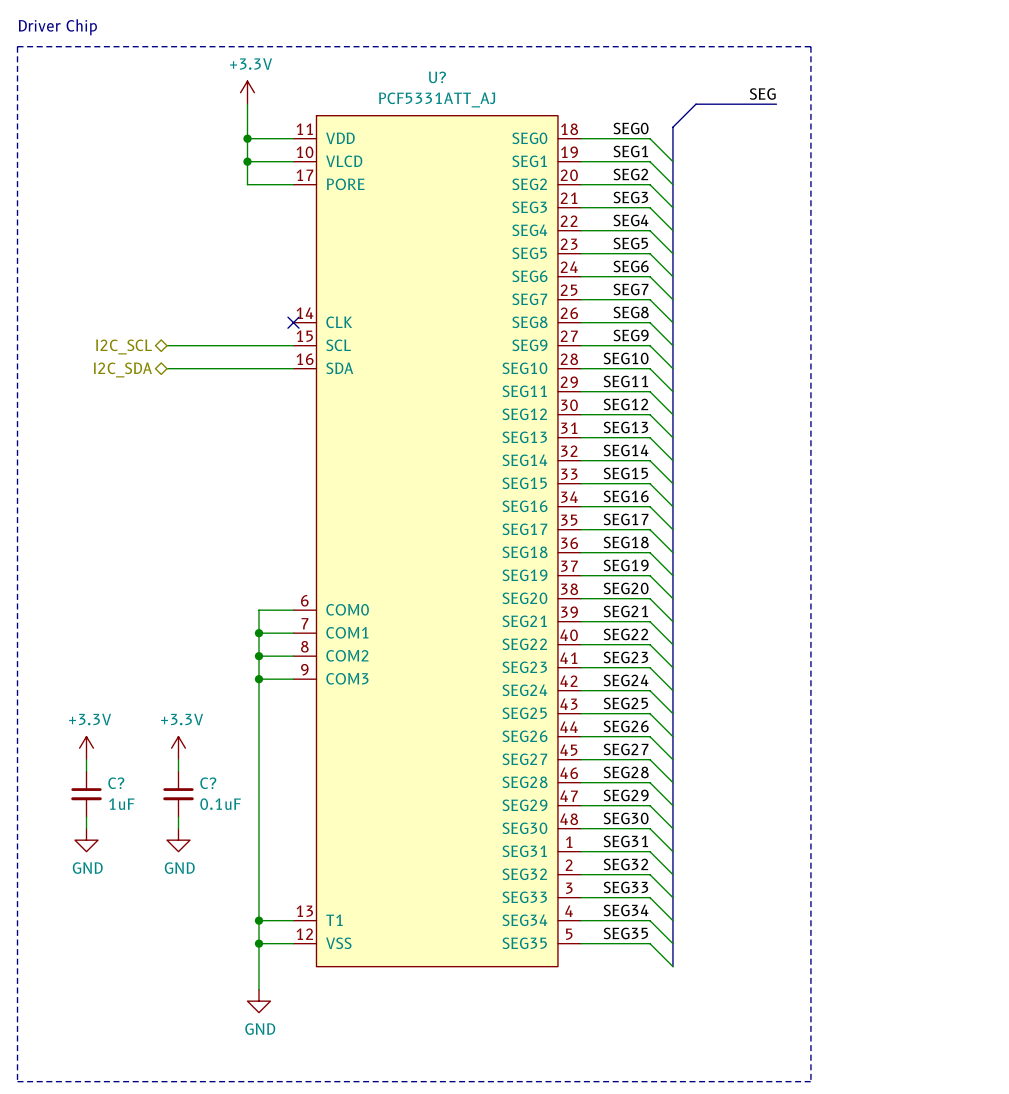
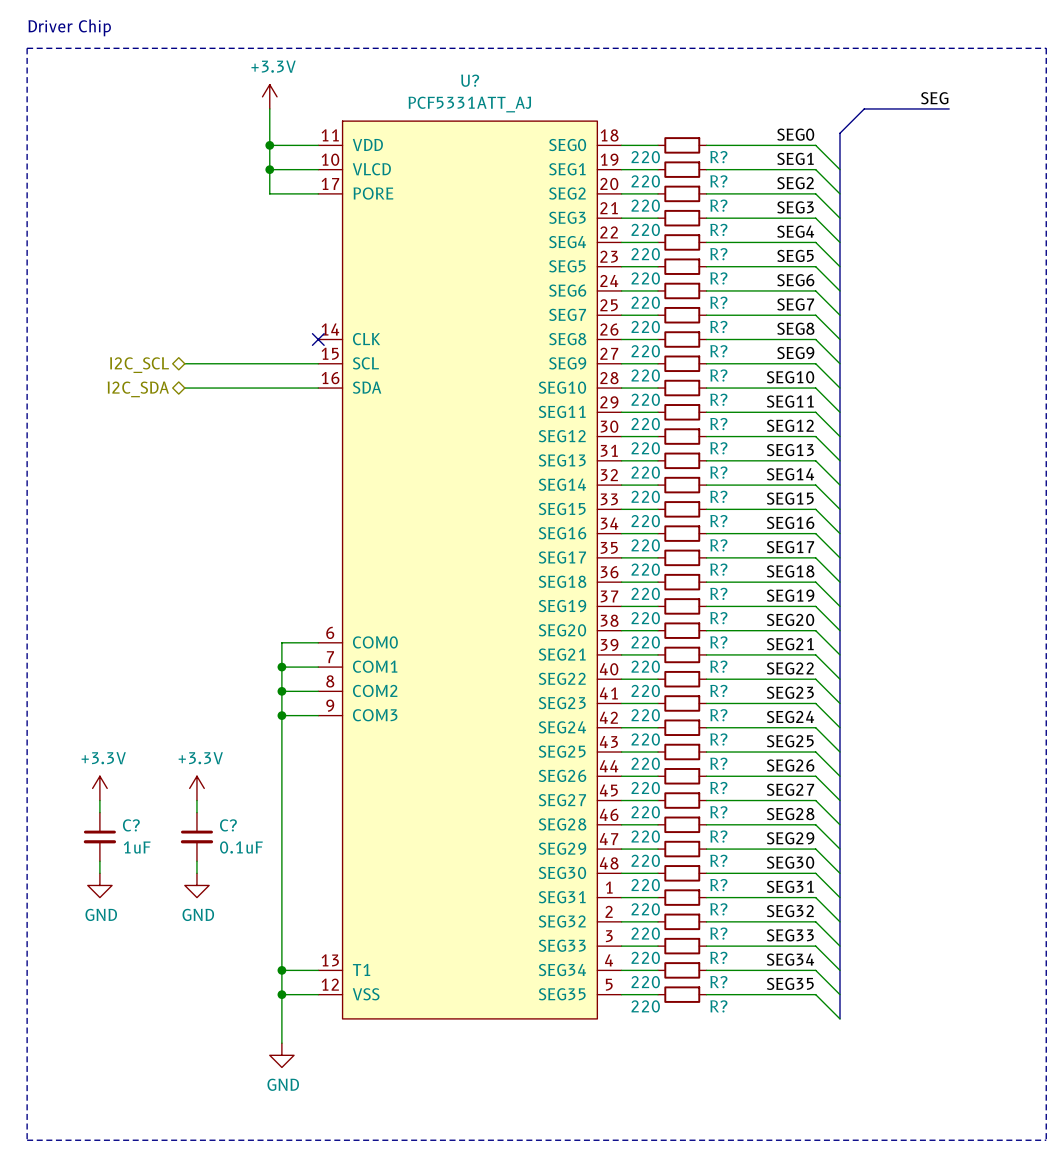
line: (810, 46) (810, 1081) -> (864, 48) (1046, 48) (1046, 1140) (864, 1140)
label position: SEG (762, 94) -> SEG (934, 98)
bus: (776, 104) (695, 104) (672, 127) (672, 966) -> (949, 108) (864, 108) (839, 133) (839, 1018)
label position: SEG0 (631, 128) -> SEG0 (795, 134)
wire: (615, 138) (649, 138) (672, 161) -> none
R?: none -> 220 (682, 145)
wire: none -> (706, 145) (815, 145) (839, 169)
label position: SEG1 (630, 151) -> SEG1 (795, 158)
wire: (615, 161) (649, 161) (672, 184) -> none
R?: none -> 220 (682, 169)
wire: none -> (706, 169) (815, 169) (839, 193)
label position: SEG2 (630, 174) -> SEG2 (795, 183)
wire: (615, 184) (649, 184) (672, 207) -> none
R?: none -> 220 (682, 193)
wire: none -> (706, 193) (815, 193) (839, 218)
label position: SEG3 (630, 197) -> SEG3 (795, 207)
wire: (615, 207) (649, 207) (672, 230) -> none
R?: none -> 220 (682, 218)
wire: none -> (706, 218) (815, 218) (839, 242)
label position: SEG4 (630, 220) -> SEG4 (795, 231)
wire: (615, 230) (649, 230) (672, 253) -> none
R?: none -> 220 (682, 242)
wire: none -> (706, 242) (815, 242) (839, 266)
label position: SEG5 (630, 243) -> SEG5 (795, 255)
wire: (615, 253) (649, 253) (672, 276) -> none
R?: none -> 220 (682, 266)
wire: none -> (706, 266) (815, 266) (839, 290)
label position: SEG6 (631, 266) -> SEG6 (795, 280)
wire: (615, 276) (649, 276) (672, 299) -> none
R?: none -> 220 (682, 290)
wire: none -> (706, 290) (815, 290) (839, 315)
label position: SEG7 (630, 289) -> SEG7 (795, 304)
wire: (615, 299) (649, 299) (672, 322) -> none
R?: none -> 220 (682, 315)
wire: none -> (706, 315) (815, 315) (839, 339)
label position: SEG8 (631, 312) -> SEG8 (795, 328)
wire: (615, 322) (649, 322) (672, 345) -> none
R?: none -> 220 (682, 339)
wire: none -> (706, 339) (815, 339) (839, 363)
label position: SEG9 (631, 335) -> SEG9 (795, 353)
wire: (615, 345) (649, 345) (672, 368) -> none
R?: none -> 220 (682, 363)
wire: none -> (706, 363) (815, 363) (839, 388)
label position: SEG10 (626, 358) -> SEG10 (790, 377)
wire: (615, 368) (649, 368) (672, 391) -> none
R?: none -> 220 (682, 388)
wire: none -> (706, 388) (815, 388) (839, 412)
label position: SEG11 (625, 381) -> SEG11 (790, 401)
wire: (615, 391) (649, 391) (672, 414) -> none
R?: none -> 220 (682, 412)
wire: none -> (706, 412) (815, 412) (839, 436)
label position: SEG12 (625, 404) -> SEG12 (790, 425)
wire: (615, 414) (649, 414) (672, 437) -> none
R?: none -> 220 (682, 436)
wire: none -> (706, 436) (815, 436) (839, 460)
label position: SEG13 (625, 427) -> SEG13 (790, 450)
wire: (615, 437) (649, 437) (672, 460) -> none
R?: none -> 220 (682, 460)
wire: none -> (706, 460) (815, 460) (839, 485)
label position: SEG14 (626, 450) -> SEG14 (790, 474)
wire: (615, 460) (649, 460) (672, 483) -> none
R?: none -> 220 (682, 485)
wire: none -> (706, 485) (815, 485) (839, 509)
label position: SEG15 (625, 473) -> SEG15 (790, 498)
wire: (615, 483) (649, 483) (672, 506) -> none
R?: none -> 220 (682, 509)
wire: none -> (706, 509) (815, 509) (839, 533)
label position: SEG16 (626, 496) -> SEG16 (790, 522)
wire: (615, 506) (649, 506) (672, 529) -> none
R?: none -> 220 (682, 533)
wire: none -> (706, 533) (815, 533) (839, 557)
label position: SEG17 (626, 519) -> SEG17 (790, 547)
wire: (615, 529) (649, 529) (672, 552) -> none
R?: none -> 220 (682, 557)
wire: none -> (706, 557) (815, 557) (839, 582)
label position: SEG18 (626, 542) -> SEG18 (790, 571)
wire: (615, 552) (649, 552) (672, 575) -> none
R?: none -> 220 (682, 582)
wire: none -> (706, 582) (815, 582) (839, 606)
label position: SEG19 (626, 565) -> SEG19 (790, 595)
wire: (615, 575) (649, 575) (672, 598) -> none
R?: none -> 220 (682, 606)
wire: none -> (706, 606) (815, 606) (839, 630)
label position: SEG20 (626, 588) -> SEG20 (790, 619)
wire: (615, 598) (649, 598) (672, 621) -> none
R?: none -> 220 (682, 630)
wire: none -> (706, 630) (815, 630) (839, 654)
label position: SEG21 (625, 611) -> SEG21 (790, 644)
wire: (615, 621) (649, 621) (672, 644) -> none
R?: none -> 220 (682, 654)
wire: none -> (706, 654) (815, 654) (839, 679)
label position: SEG22 (625, 634) -> SEG22 (790, 668)
wire: (615, 644) (649, 644) (672, 667) -> none
R?: none -> 220 (682, 679)
wire: none -> (706, 679) (815, 679) (839, 703)
label position: SEG23 (625, 657) -> SEG23 (790, 692)
wire: (615, 667) (649, 667) (672, 690) -> none
R?: none -> 220 (682, 703)
wire: none -> (706, 703) (815, 703) (839, 727)
label position: SEG24 (626, 680) -> SEG24 (790, 716)
wire: (615, 690) (649, 690) (672, 713) -> none
R?: none -> 220 (682, 727)
wire: none -> (706, 727) (815, 727) (839, 752)
label position: SEG25 (625, 703) -> SEG25 (790, 741)
wire: (615, 713) (649, 713) (672, 736) -> none
R?: none -> 220 (682, 752)
wire: none -> (706, 752) (815, 752) (839, 776)
label position: SEG26 (626, 726) -> SEG26 (790, 765)
wire: (615, 736) (649, 736) (672, 759) -> none
R?: none -> 220 (682, 776)
wire: none -> (706, 776) (815, 776) (839, 800)
label position: SEG27 (626, 749) -> SEG27 (790, 789)
wire: (615, 759) (649, 759) (672, 782) -> none
R?: none -> 220 (682, 800)
wire: none -> (706, 800) (815, 800) (839, 824)
label position: SEG28 (626, 772) -> SEG28 (790, 814)
wire: (615, 782) (649, 782) (672, 805) -> none
R?: none -> 220 (682, 824)
wire: none -> (706, 824) (815, 824) (839, 849)
label position: SEG29 (626, 795) -> SEG29 (790, 838)
wire: (615, 805) (649, 805) (672, 828) -> none
R?: none -> 220 (682, 849)
wire: none -> (706, 849) (815, 849) (839, 873)
label position: SEG30 (626, 818) -> SEG30 (790, 862)
wire: (615, 828) (649, 828) (672, 851) -> none
R?: none -> 220 (682, 873)
wire: none -> (706, 873) (815, 873) (839, 897)
label position: SEG31 (625, 841) -> SEG31 (790, 886)
wire: (615, 851) (649, 851) (672, 874) -> none
R?: none -> 220 (682, 897)
wire: none -> (706, 897) (815, 897) (839, 921)
label position: SEG32 (625, 864) -> SEG32 (790, 911)
wire: (615, 874) (649, 874) (672, 897) -> none
R?: none -> 220 (682, 921)
wire: none -> (706, 921) (815, 921) (839, 946)
label position: SEG33 (625, 887) -> SEG33 (790, 935)
wire: (615, 897) (649, 897) (672, 920) -> none
R?: none -> 220 (682, 946)
wire: none -> (706, 946) (815, 946) (839, 970)
label position: SEG34 (626, 910) -> SEG34 (790, 959)
wire: (615, 920) (649, 920) (672, 943) -> none
R?: none -> 220 (682, 970)
wire: none -> (706, 970) (815, 970) (839, 994)
label position: SEG35 (625, 933) -> SEG35 (790, 983)
wire: (615, 943) (649, 943) (672, 966) -> none
R?: none -> 220 (682, 994)
wire: none -> (706, 994) (815, 994) (839, 1018)

